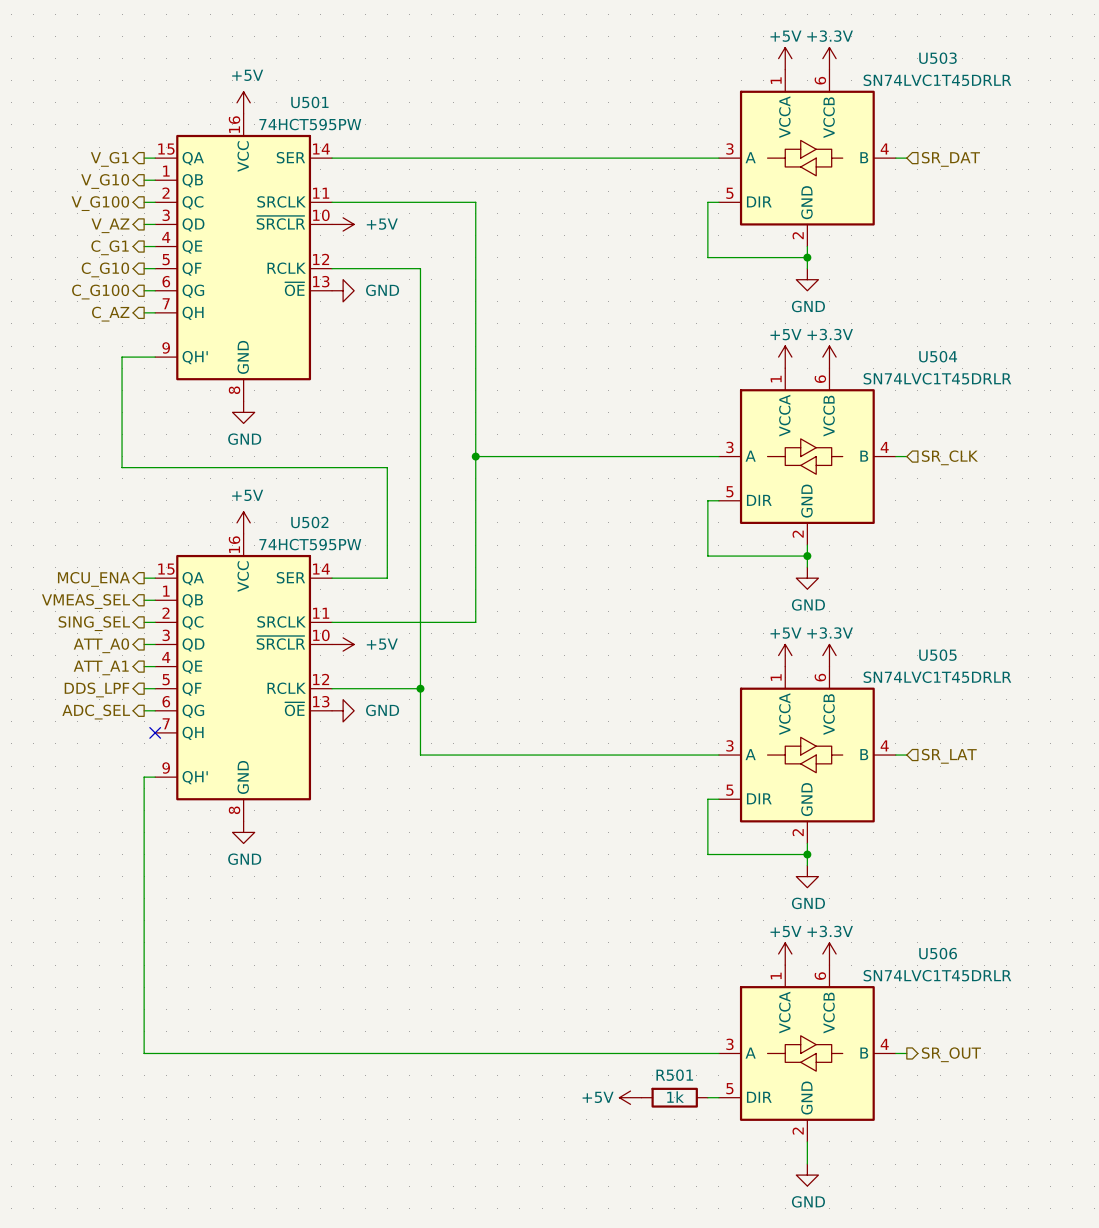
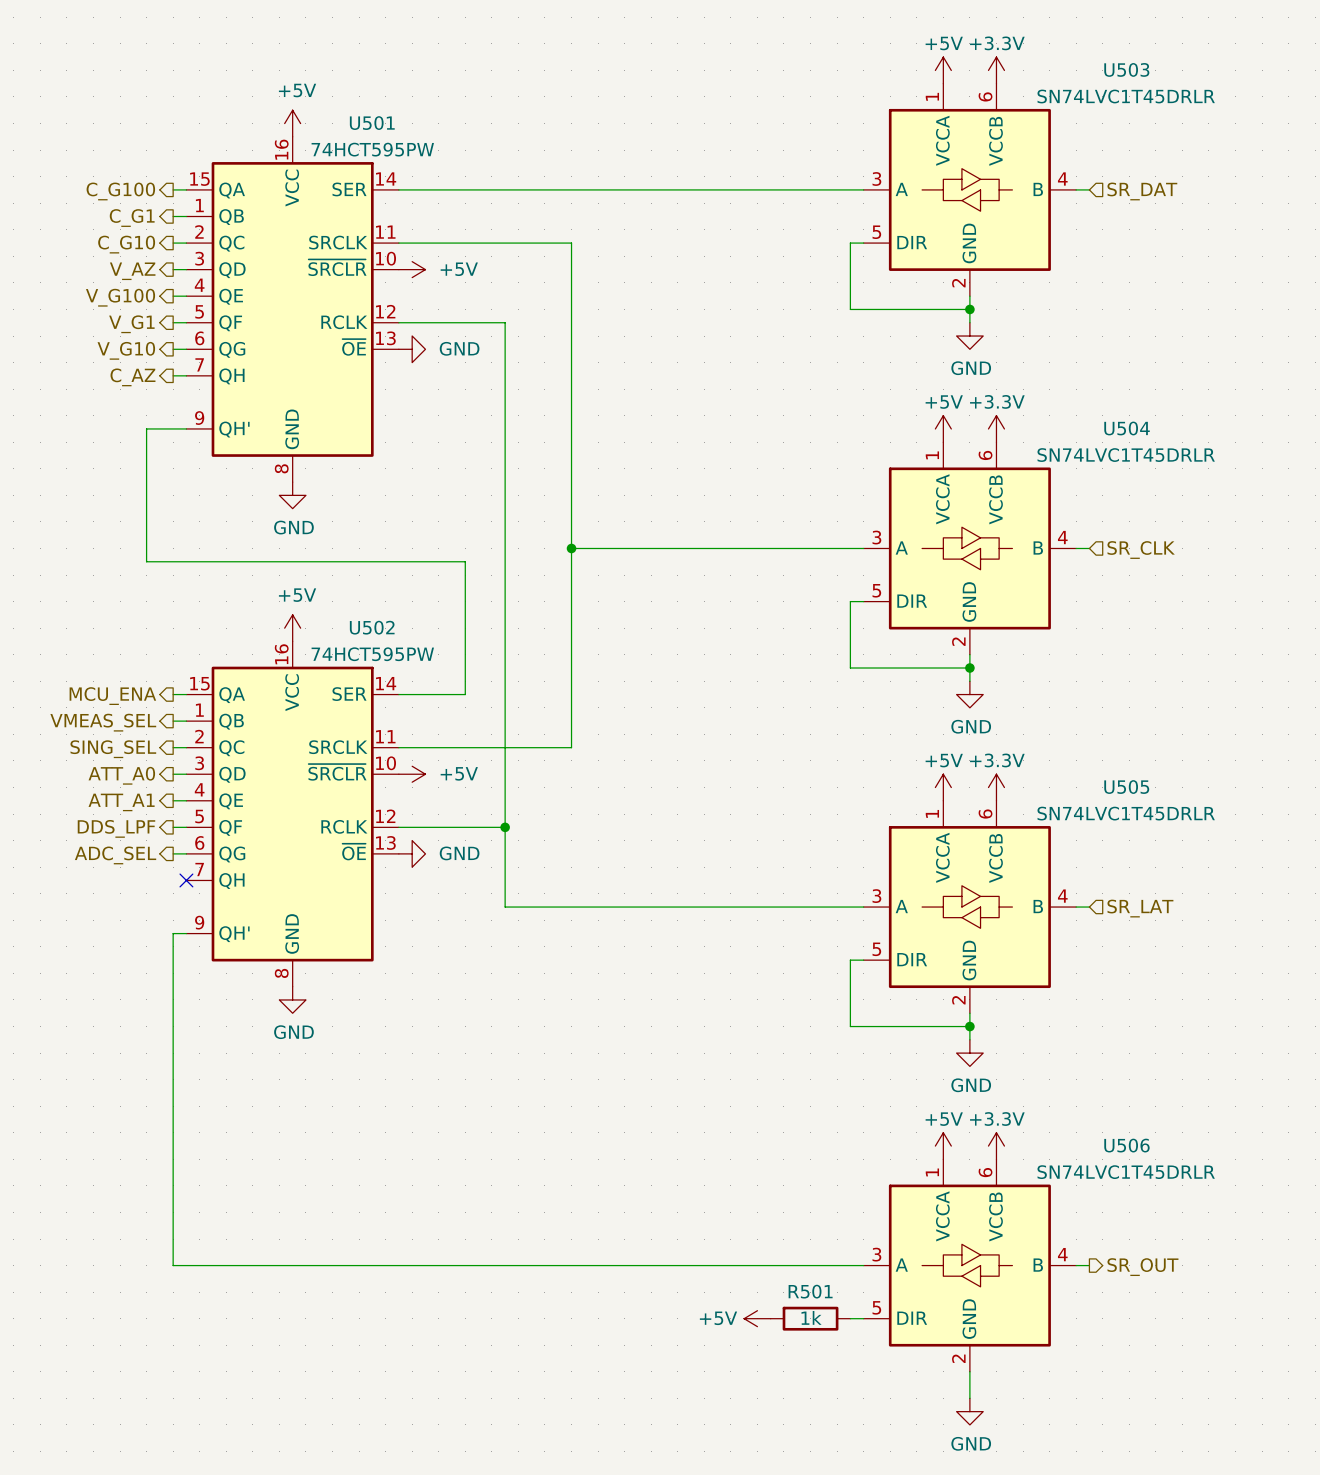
hierarchical label: V_G1 (109, 159) -> C_G100 (120, 191)
hierarchical label: V_G10 (105, 181) -> C_G1 (132, 218)
hierarchical label: V_G100 (100, 203) -> C_G10 (126, 244)
hierarchical label: C_G1 (110, 247) -> V_G100 (120, 297)
hierarchical label: C_G10 (105, 269) -> V_G1 (131, 324)
hierarchical label: C_G100 (100, 292) -> V_G10 (126, 350)

